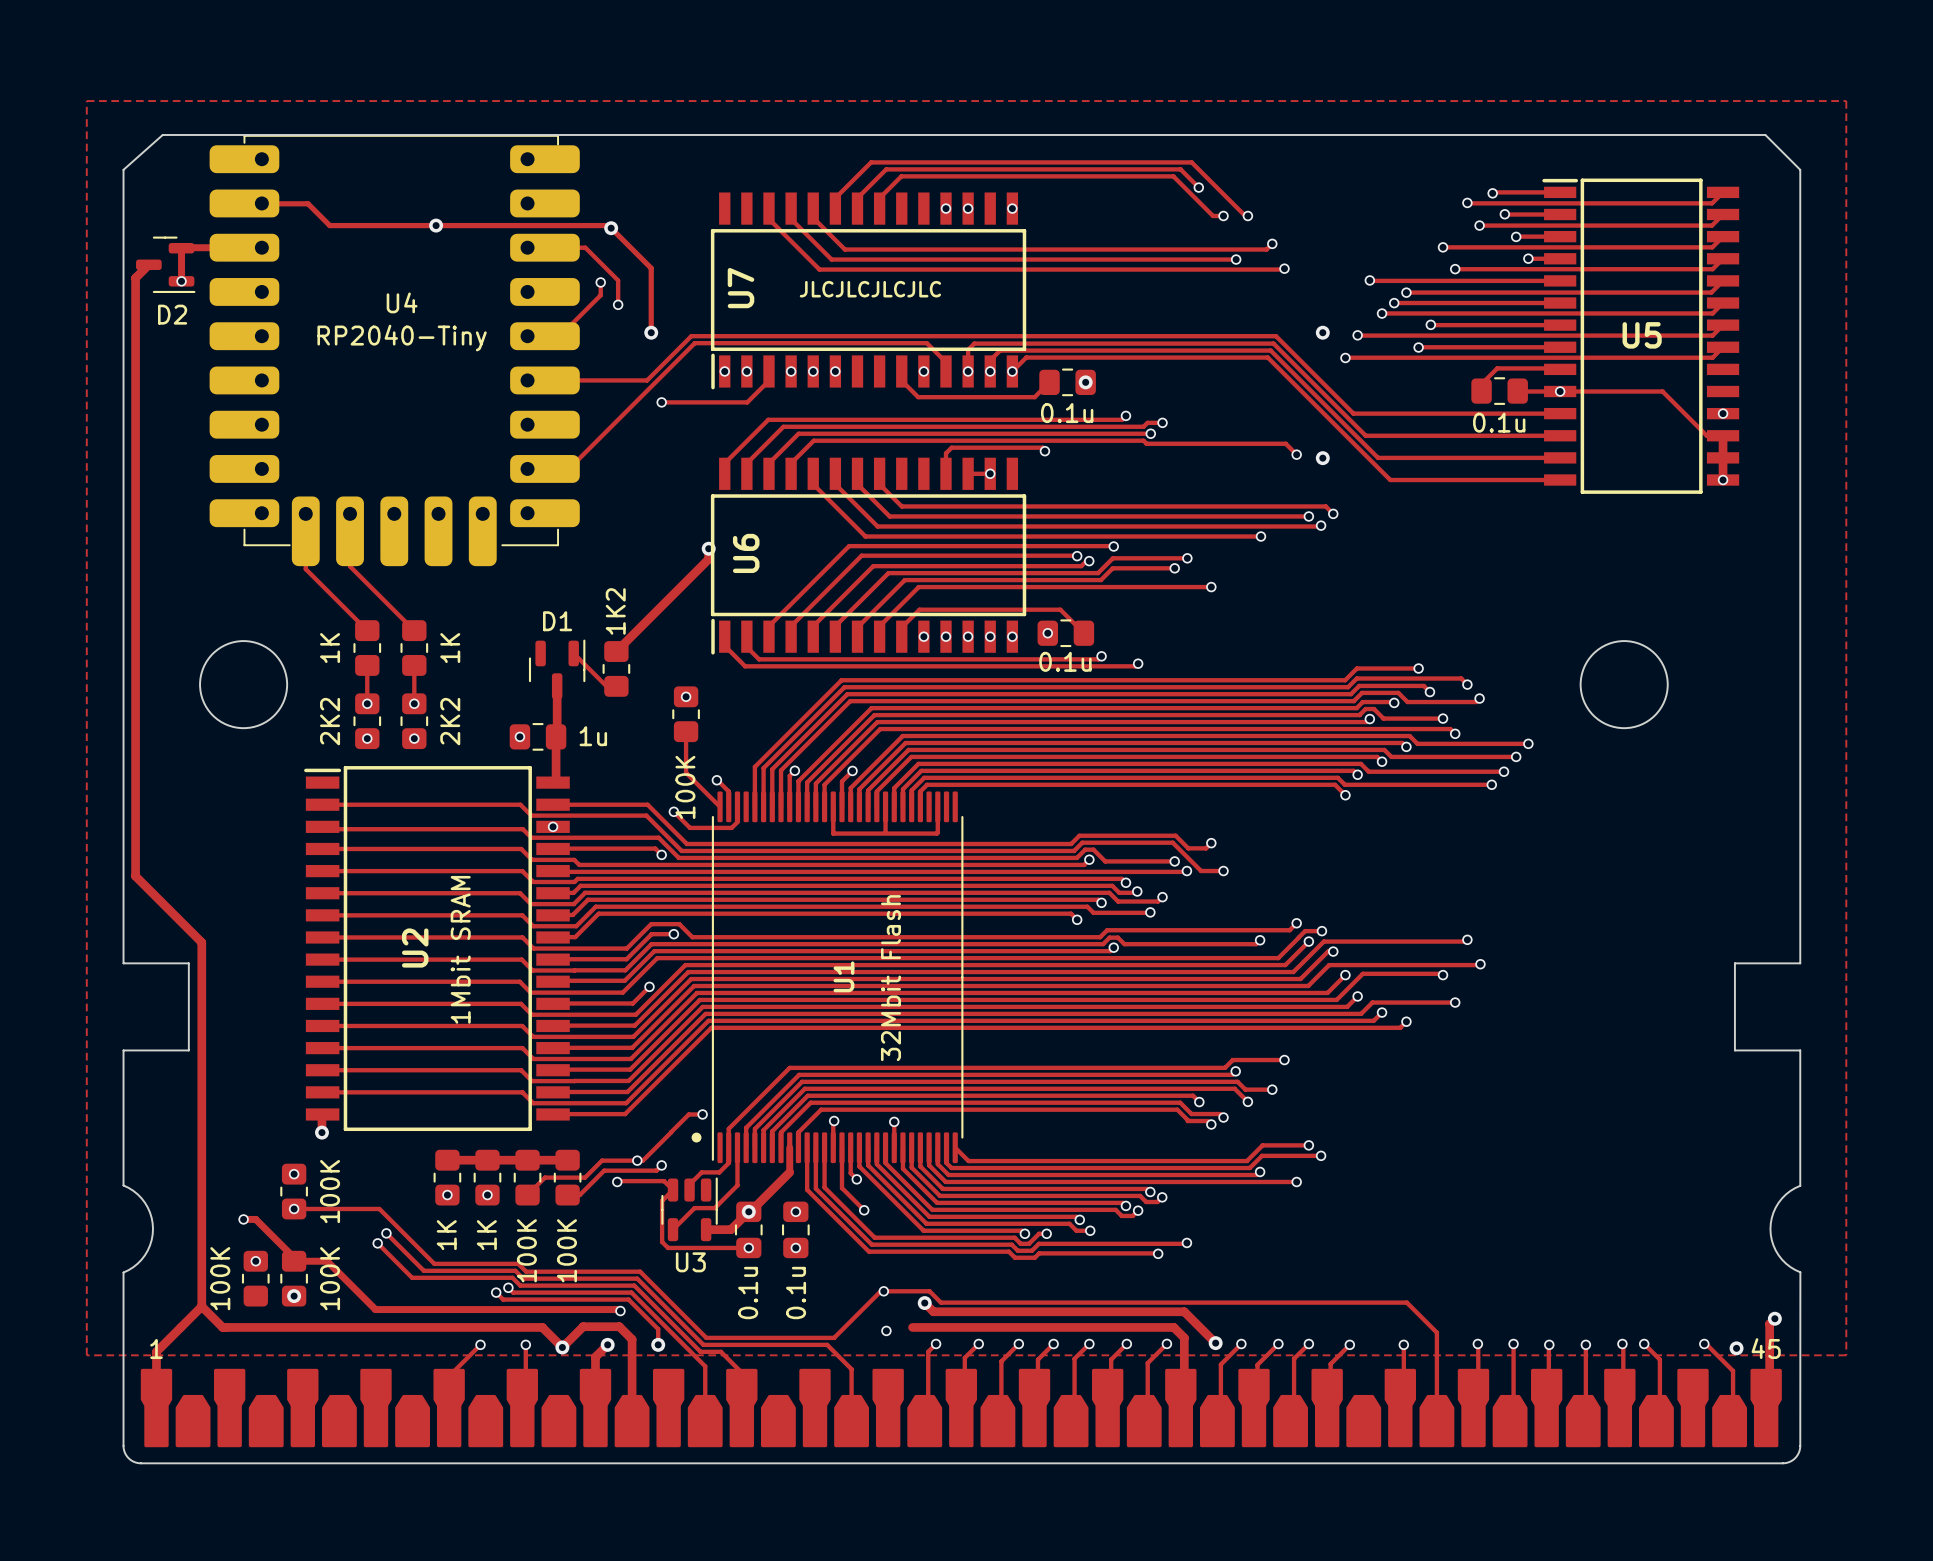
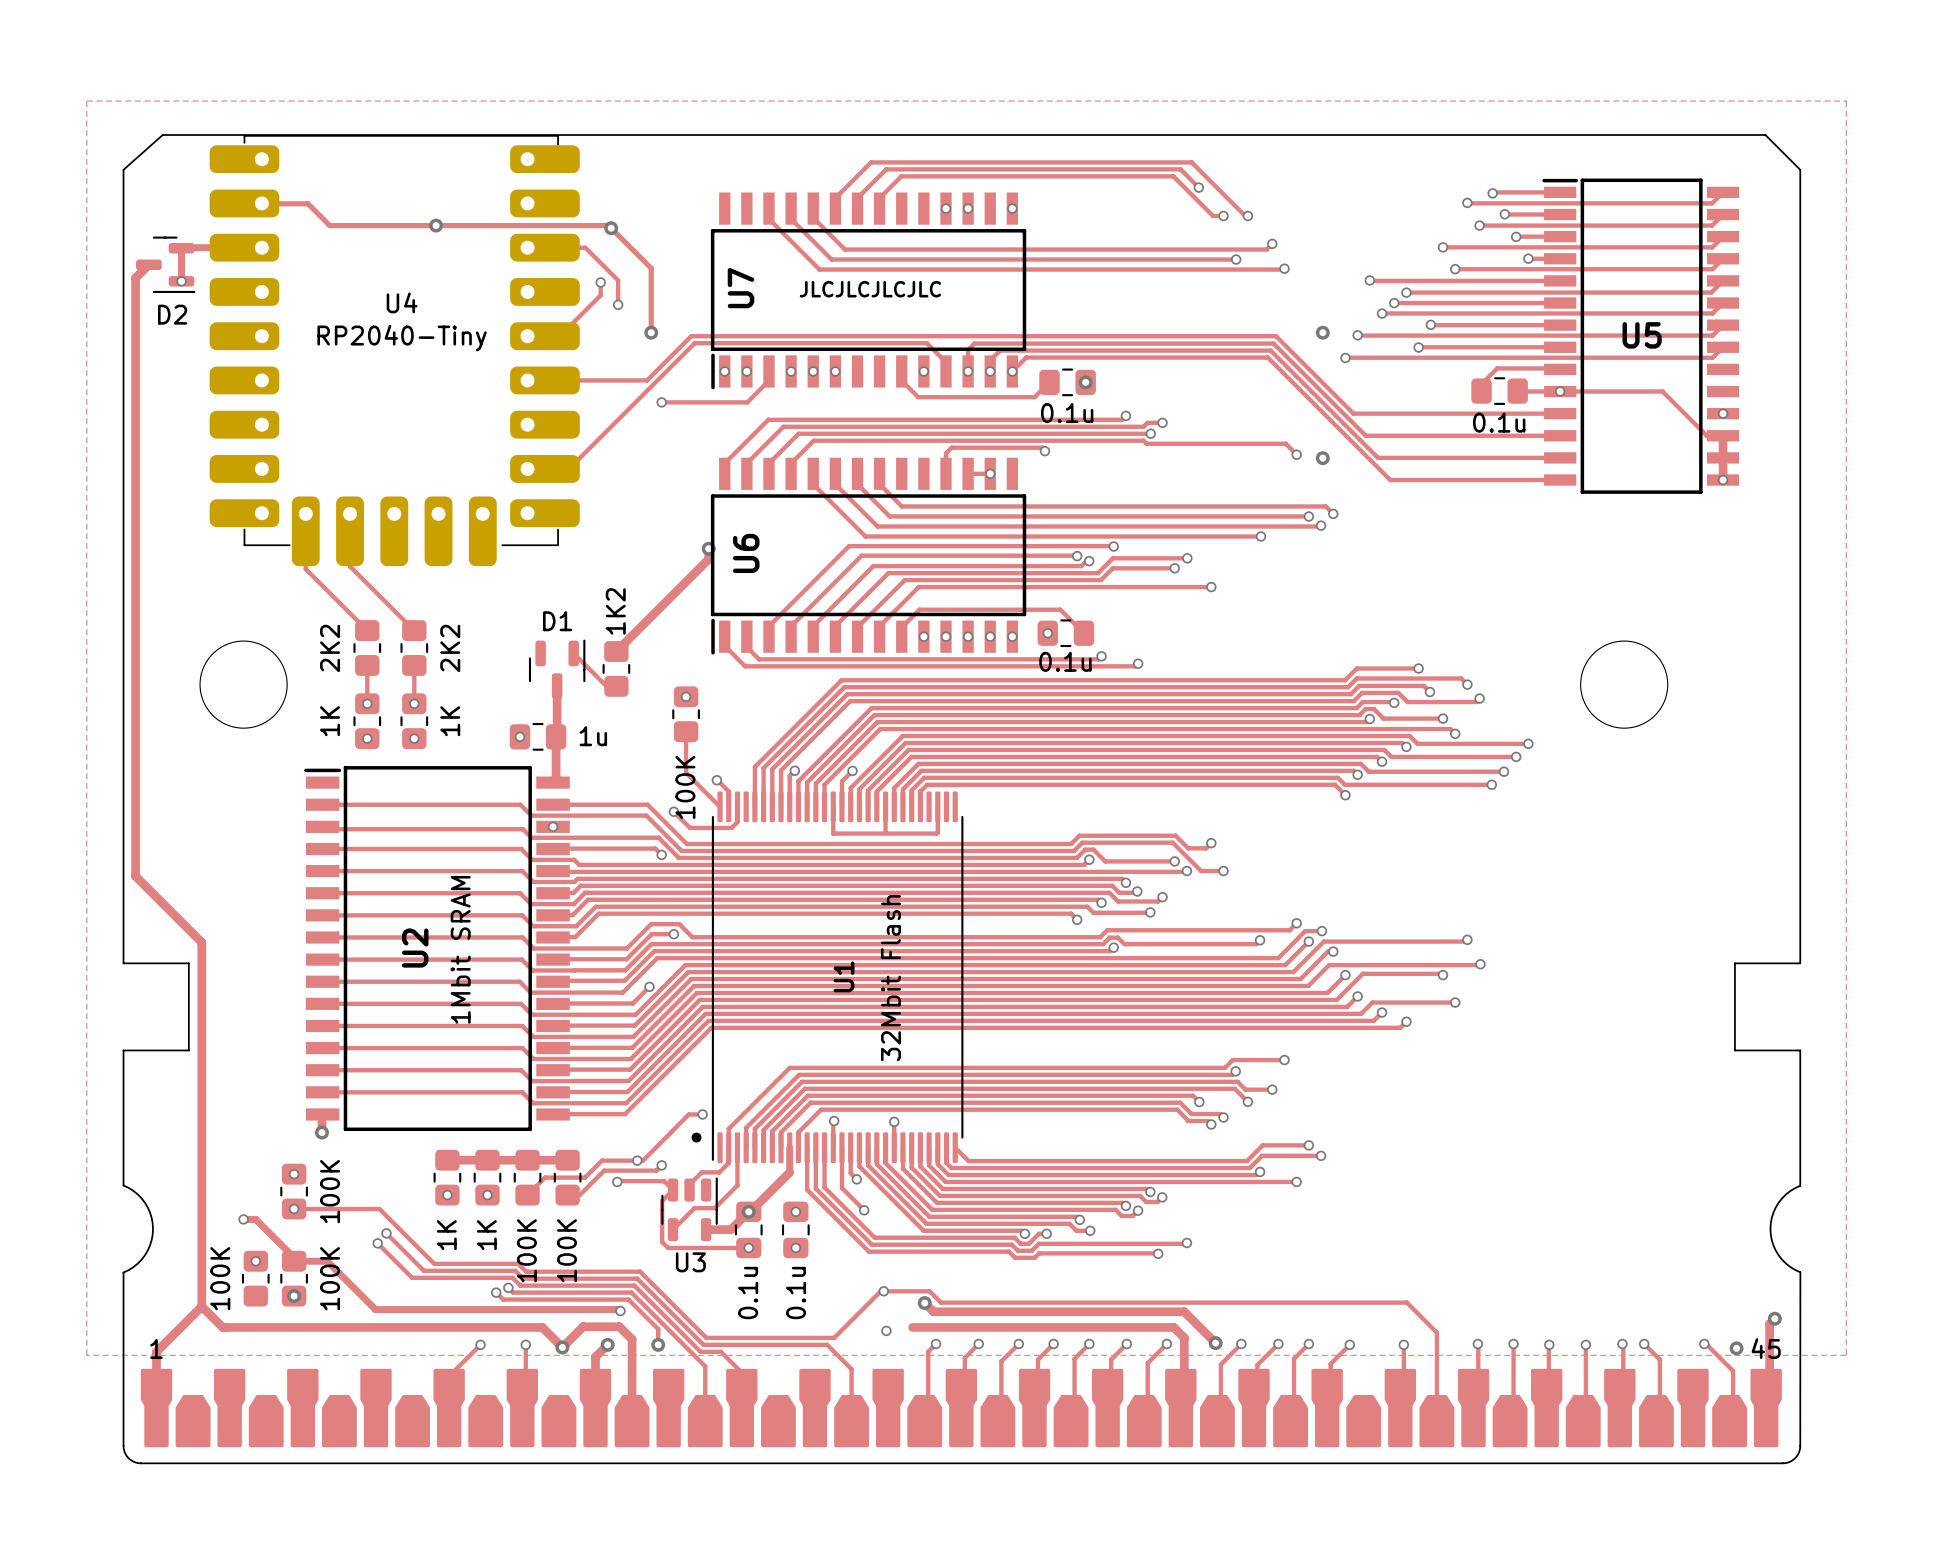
part value: 1K (330, 648) -> 2K2 (330, 648)
part value: 1K (450, 648) -> 2K2 (450, 648)
part value: 2K2 (330, 721) -> 1K (330, 721)
part value: 2K2 (450, 721) -> 1K (450, 721)

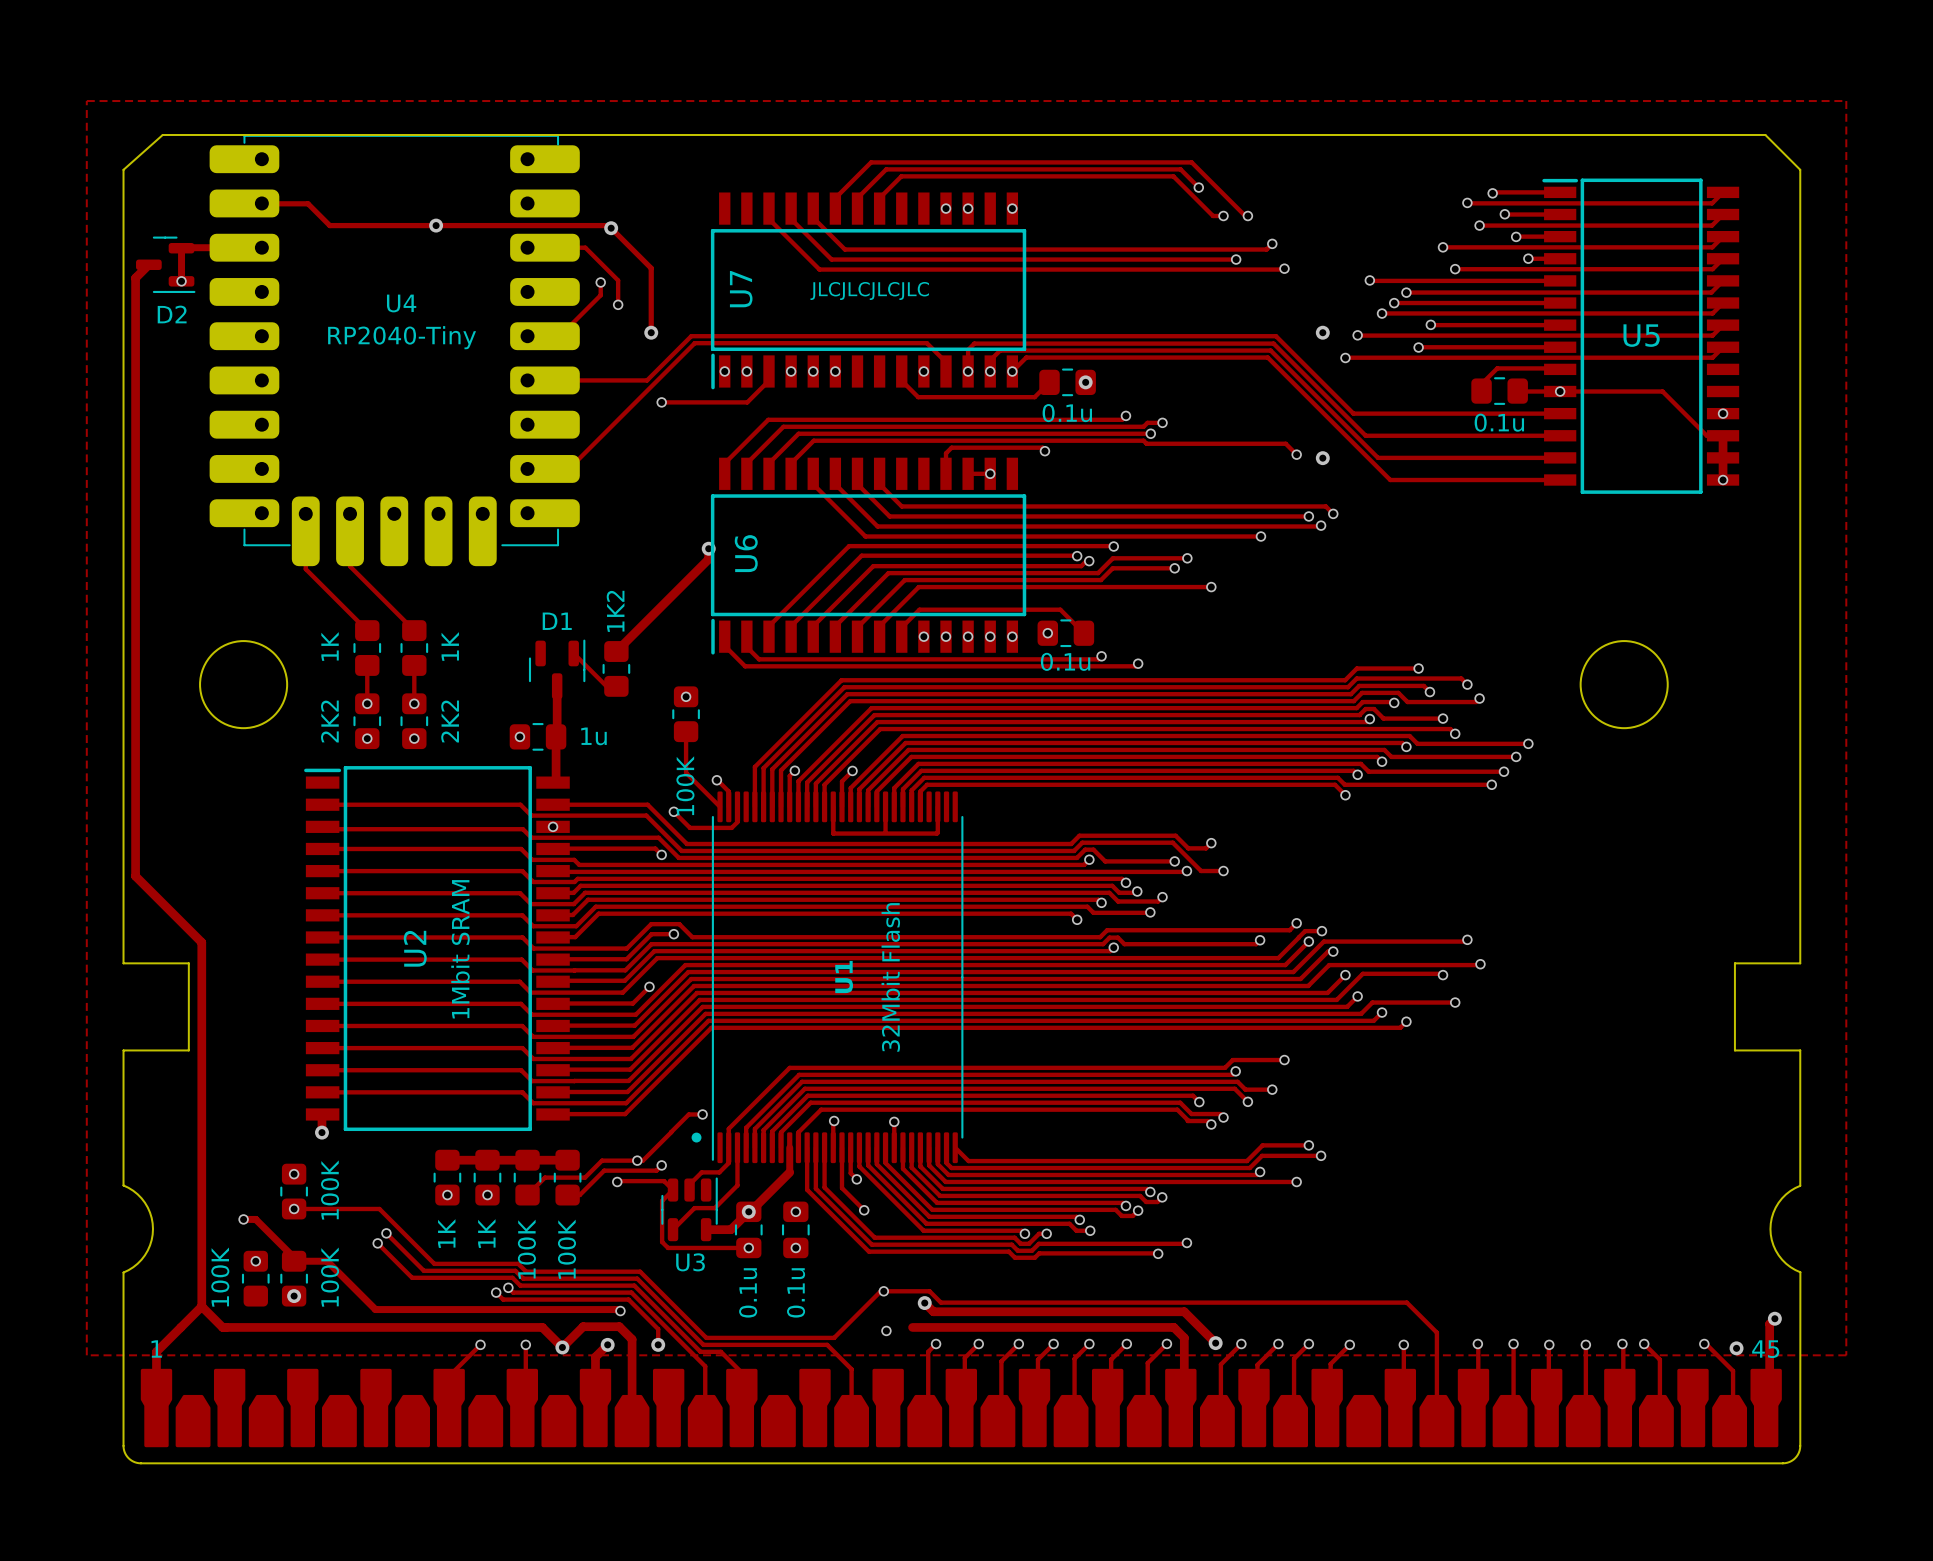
part value: 2K2 (330, 648) -> 1K (330, 646)
part value: 2K2 (450, 648) -> 1K (450, 646)
part value: 1K (330, 721) -> 2K2 (329, 721)
part value: 1K (450, 721) -> 2K2 (450, 721)

